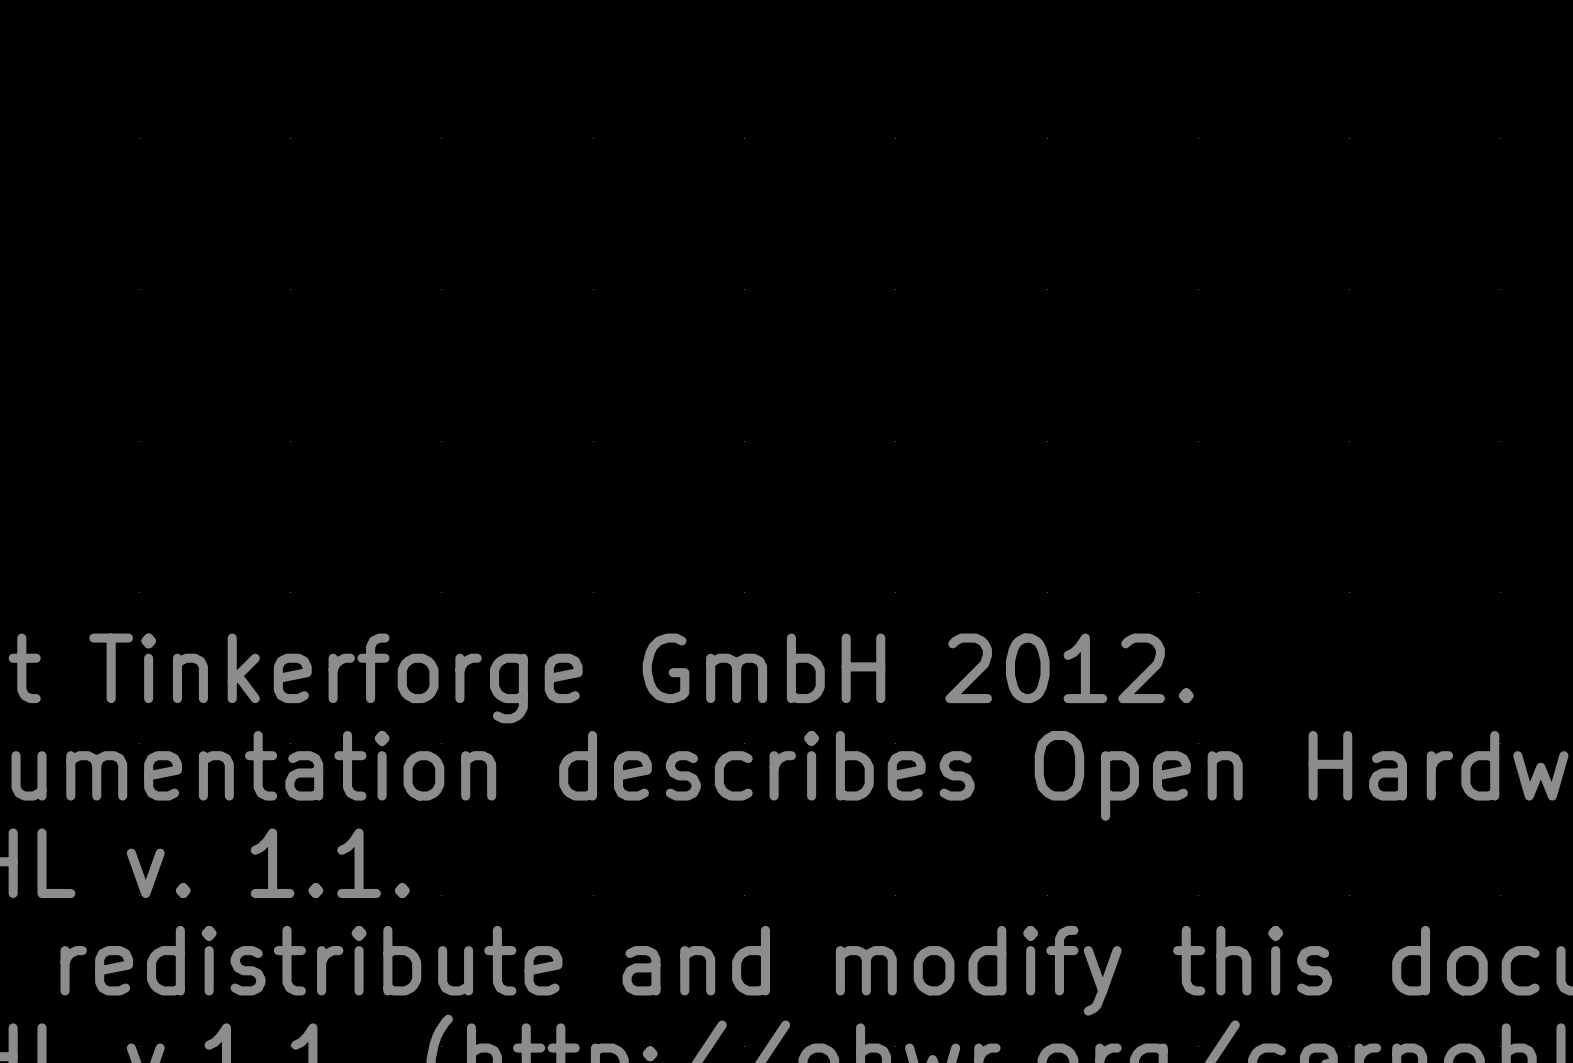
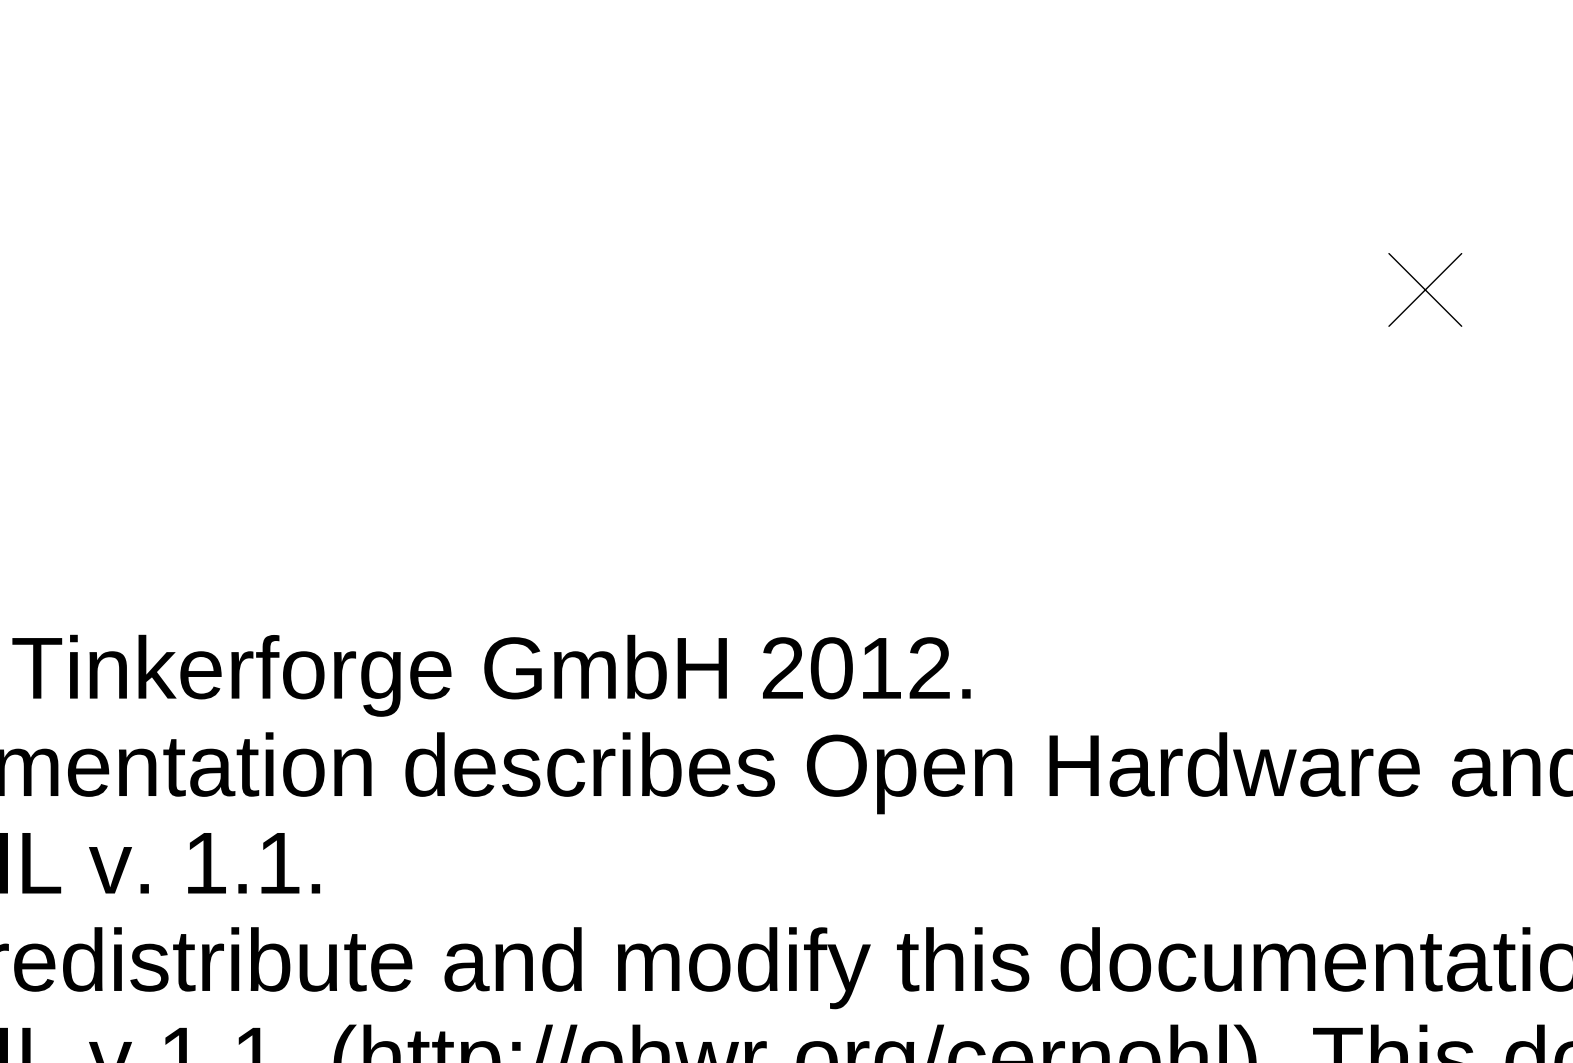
no-connect mark: none -> (1425, 289)

